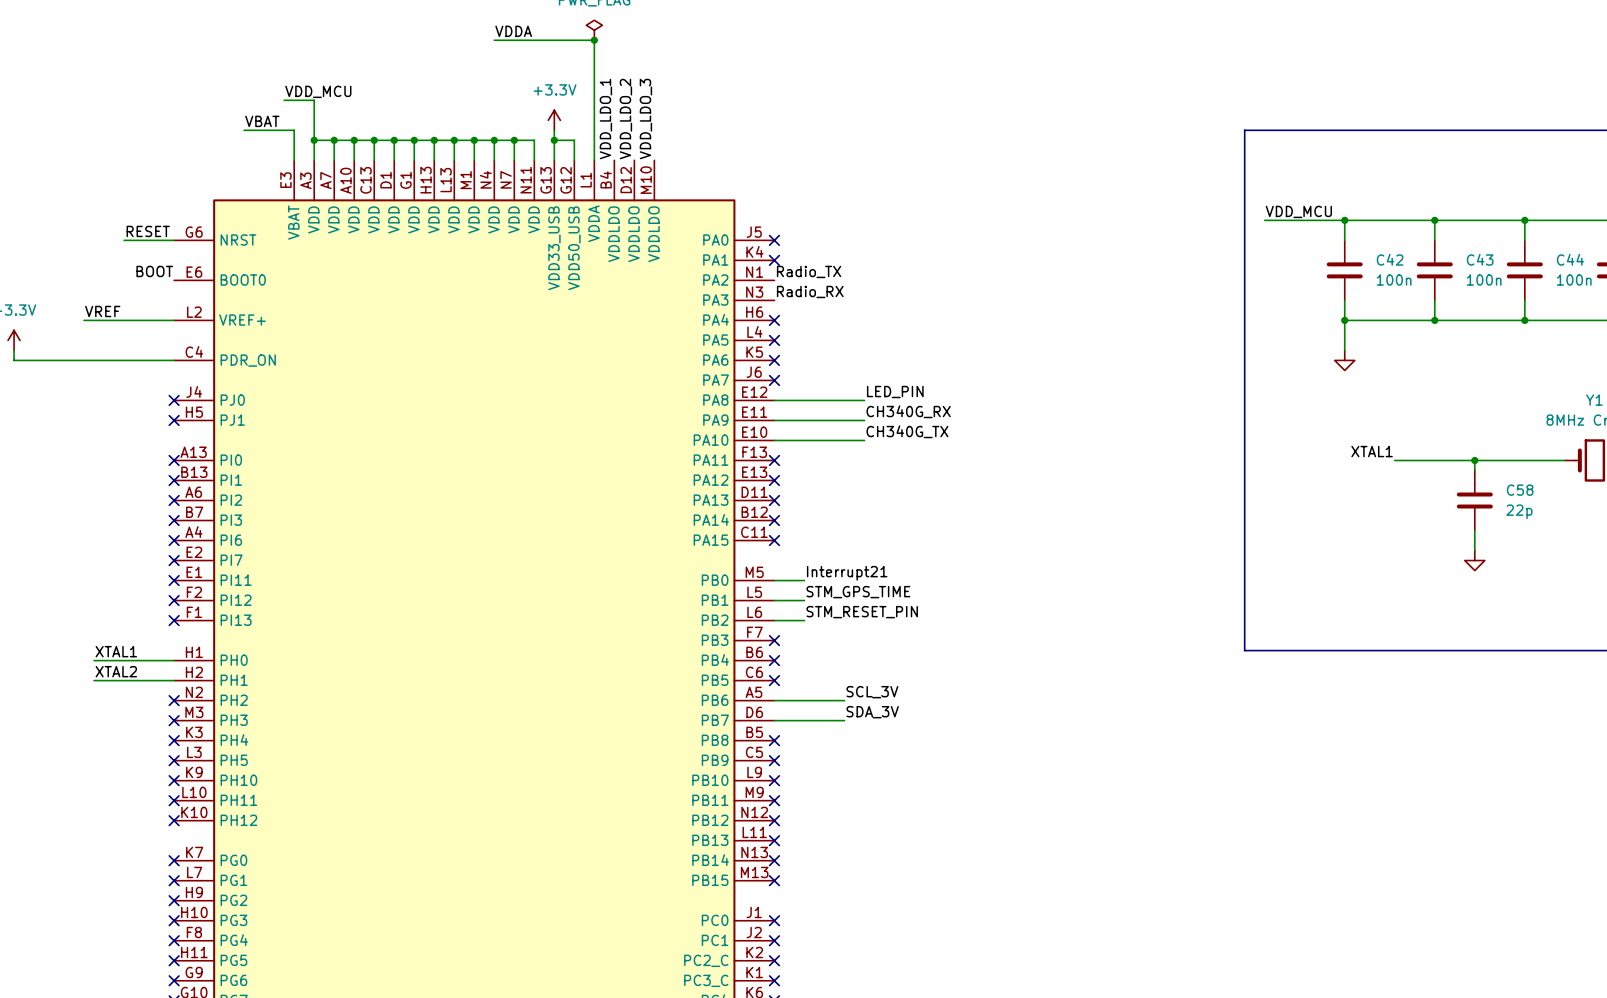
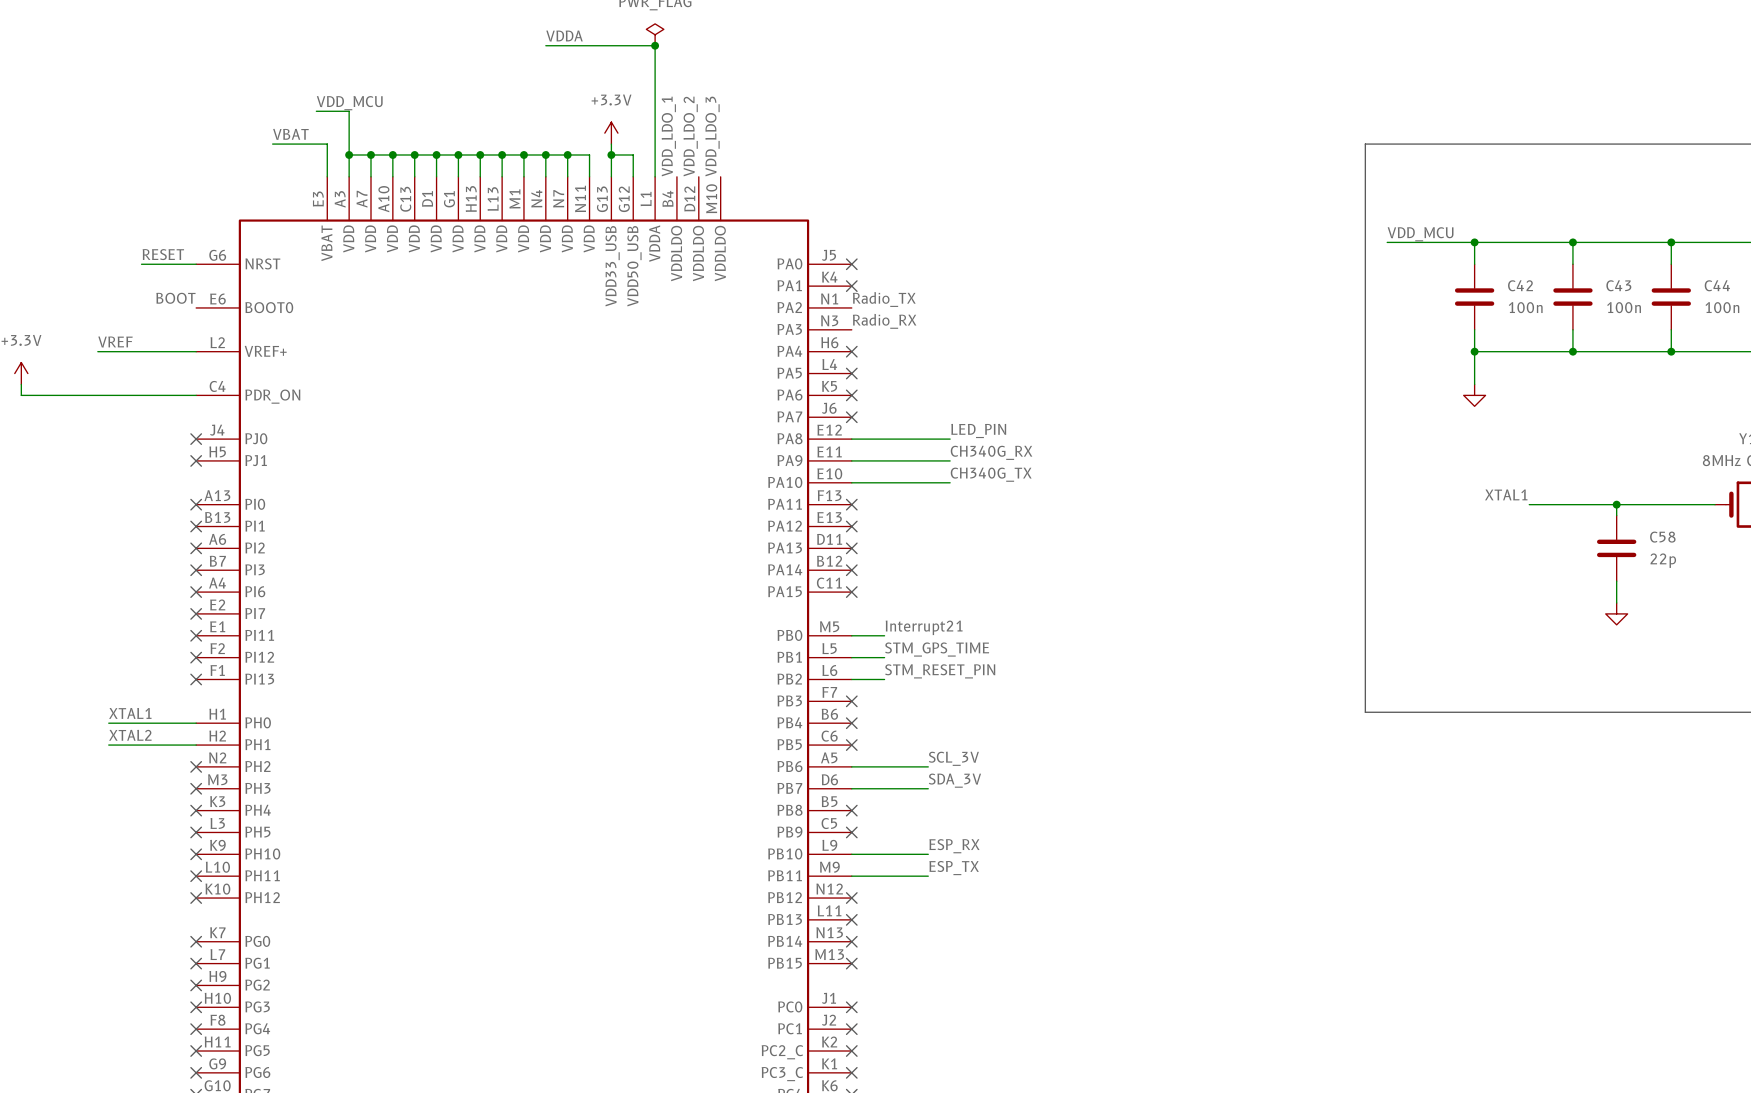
label: none -> ESP_RX (954, 846)
wire: none -> (851, 854) (928, 854)
no-connect mark: (774, 780) -> none
label: none -> ESP_TX (954, 868)
wire: none -> (851, 876) (928, 876)
no-connect mark: (774, 800) -> none

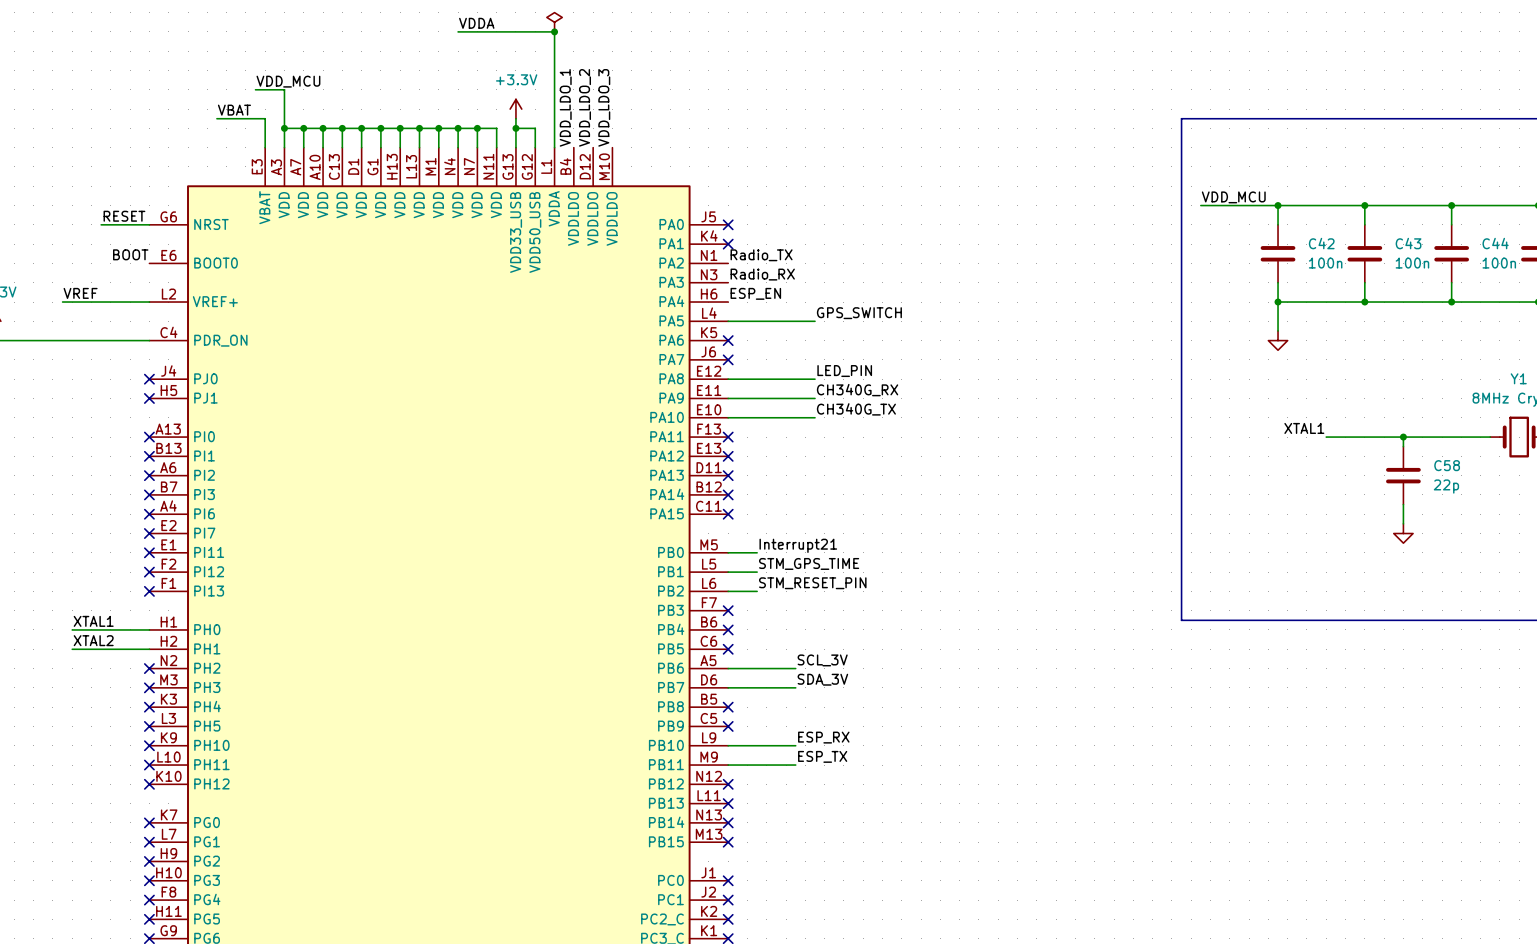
label: none -> ESP_EN (755, 293)
no-connect mark: (851, 351) -> none
label: none -> GPS_SWITCH (859, 313)
wire: none -> (728, 321) (815, 321)
no-connect mark: (851, 373) -> none

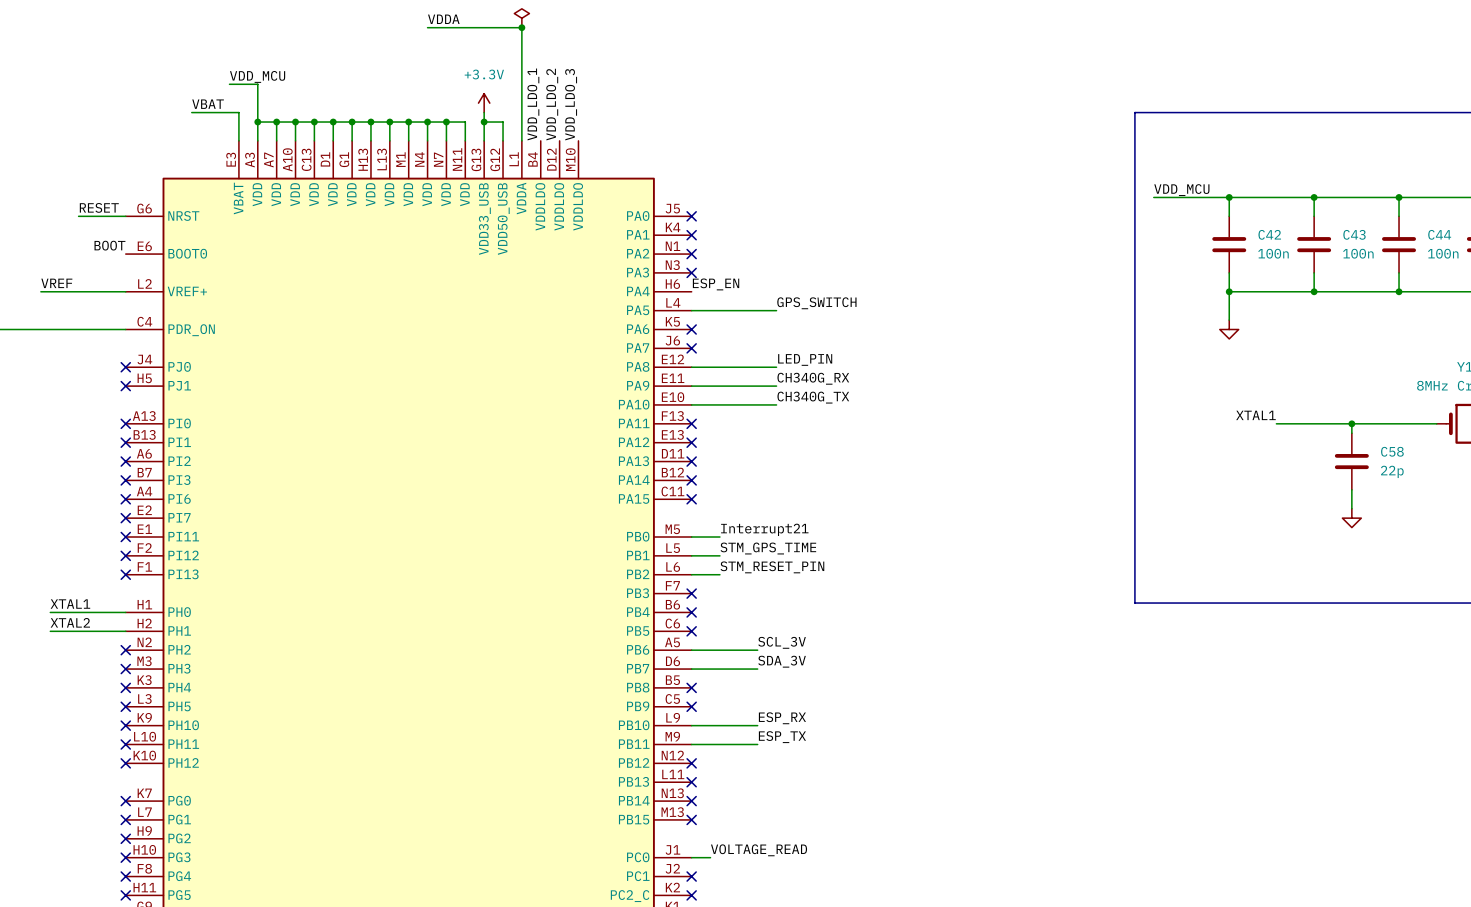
label: Radio_TX (761, 255) -> none
no-connect mark: none -> (691, 254)
label: Radio_RX (762, 274) -> none
no-connect mark: none -> (691, 272)
label: none -> VOLTAGE_READ (759, 850)
wire: none -> (691, 857) (710, 857)
no-connect mark: (728, 880) -> none

